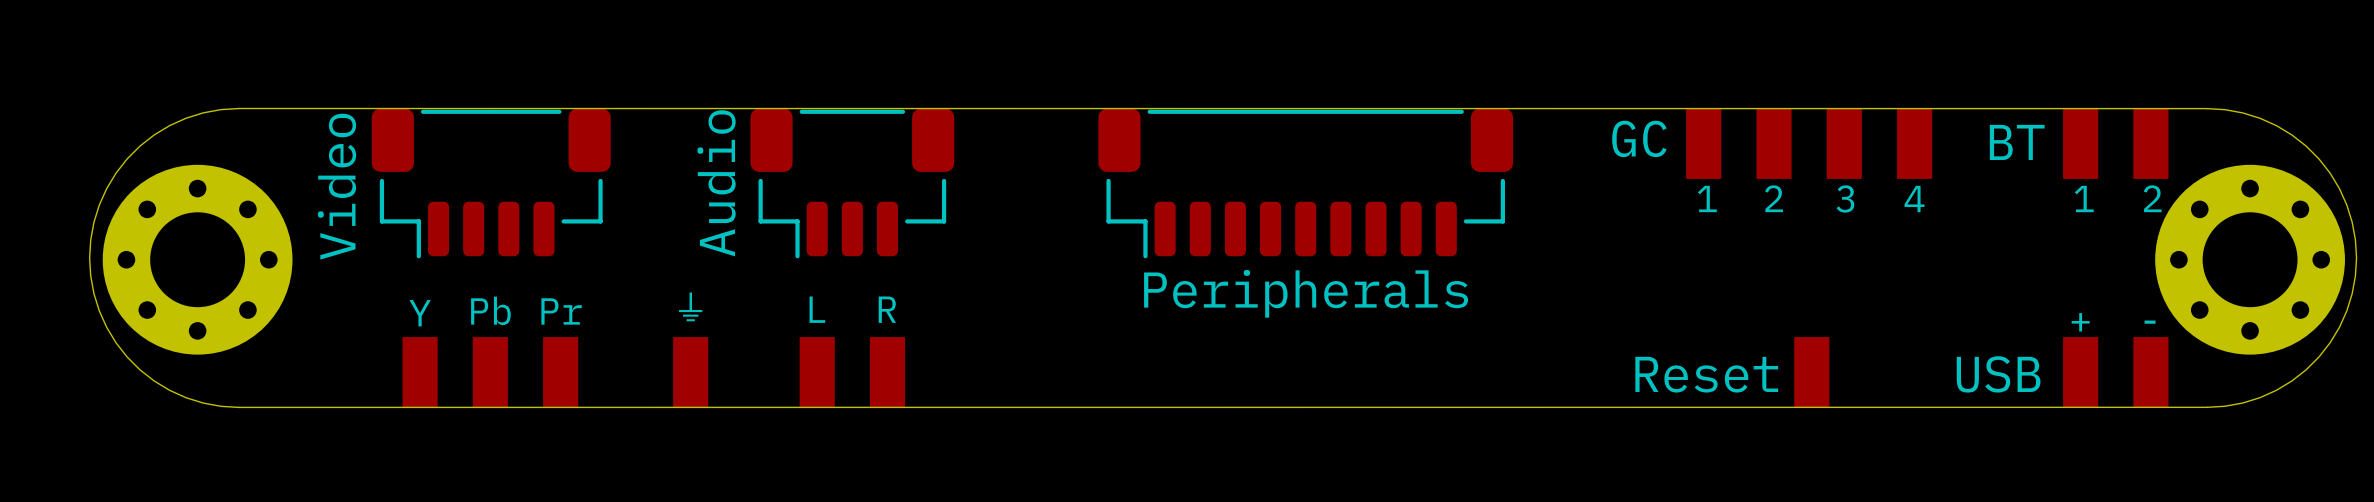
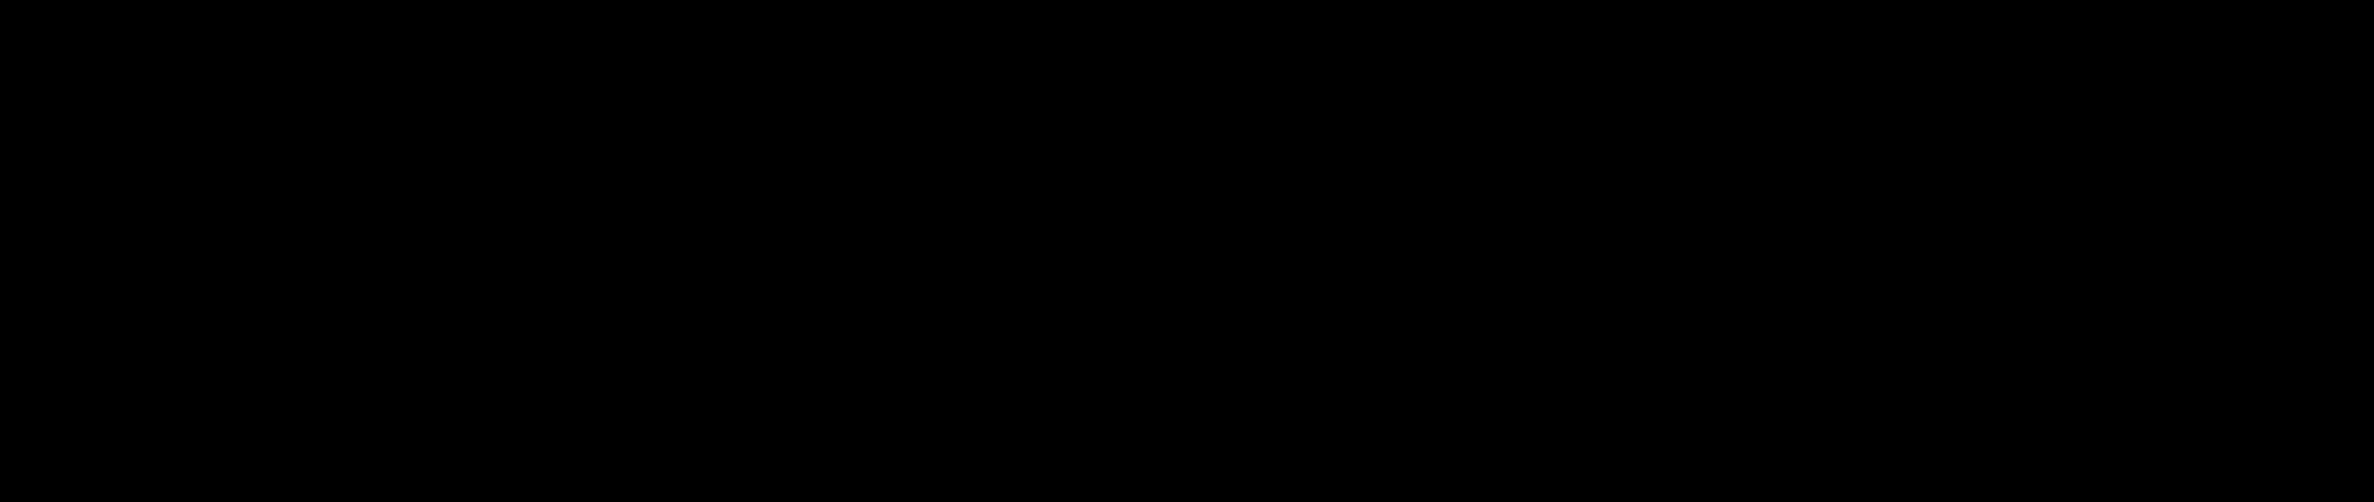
board edge: (239, 108) (2225, 109) (2260, 118) (2276, 125) (2306, 146) (2318, 158) (2339, 188) (2346, 205) (2355, 239) (2355, 275) (2346, 310) (2339, 327) (2318, 357) (2306, 369) (2276, 390) (2260, 397) (2225, 406) (221, 406) (186, 397) (169, 390) (154, 380) (127, 357) (106, 327) (99, 310) (93, 293) (89, 257) (93, 222) (99, 204) (106, 188) (127, 158) (154, 134) (186, 118) (203, 112) (239, 108) -> none
part: GC (1809, 143) -> none
part: BT (2115, 143) -> none
part: (491, 183) -> none
part: (852, 183) -> none
part: Peripherals (1305, 183) -> none
text: 1 (1707, 198) -> none
text: 2 (1774, 198) -> none
text: 3 (1845, 198) -> none
text: 4 (1914, 198) -> none
text: 1 (2084, 198) -> none
text: 2 (2152, 198) -> none
part: (197, 259) -> none
part: (2250, 259) -> none
text: L (817, 309) -> none
text: R (887, 309) -> none
text: Pb (490, 310) -> none
text: Pr (561, 311) -> none
text: Y (420, 313) -> none
text: + (2080, 322) -> none
text: - (2150, 322) -> none
part: Video (490, 372) -> none
part: ⏚ (690, 372) -> none
part: Audio (852, 372) -> none
part: Reset (1811, 372) -> none
part: USB (2115, 372) -> none

